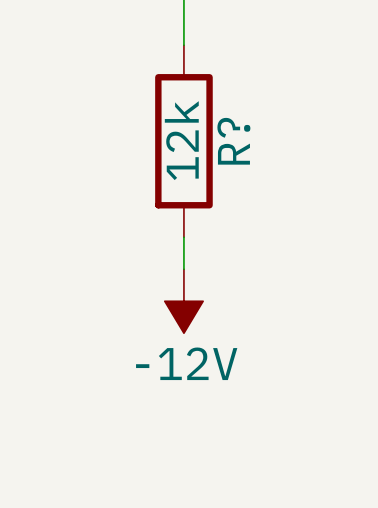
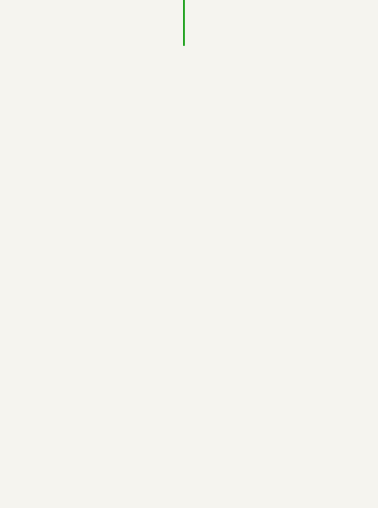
R?: 12k (183, 141) -> none
wire: (183, 237) (183, 269) -> none
power symbol: -12V (183, 301) -> none

